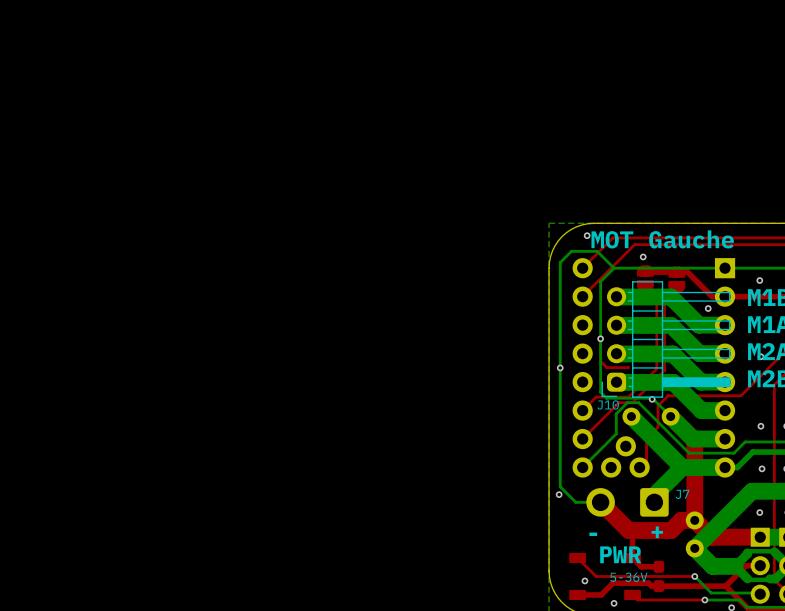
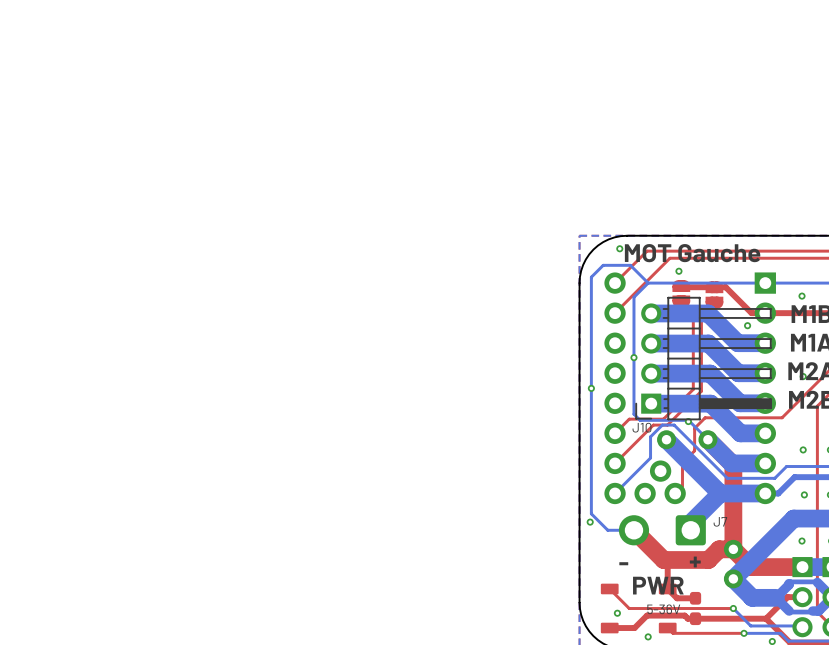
J10 footprint: [601, 281, 731, 398] -> [635, 297, 772, 421]
top track: (600, 338) (600, 361) (606, 367) (628, 367) -> none

